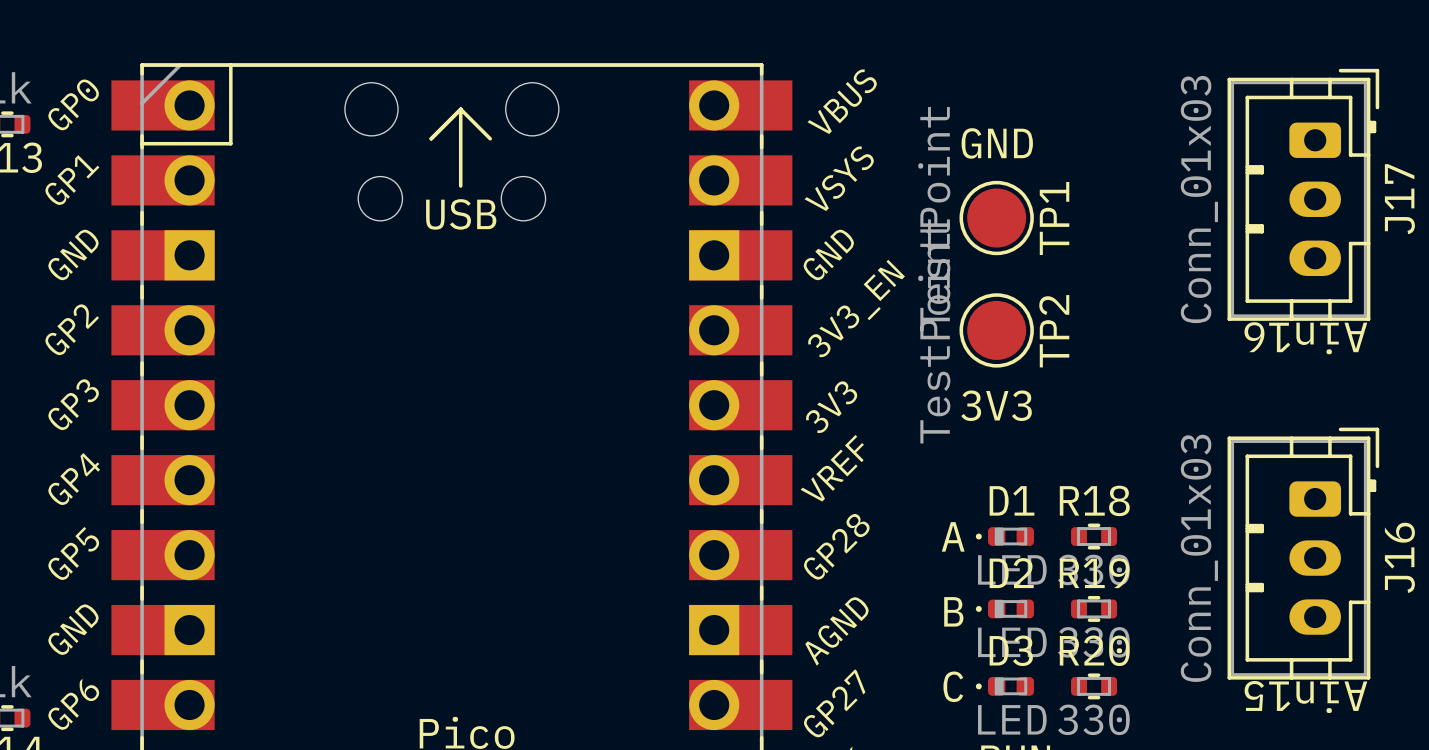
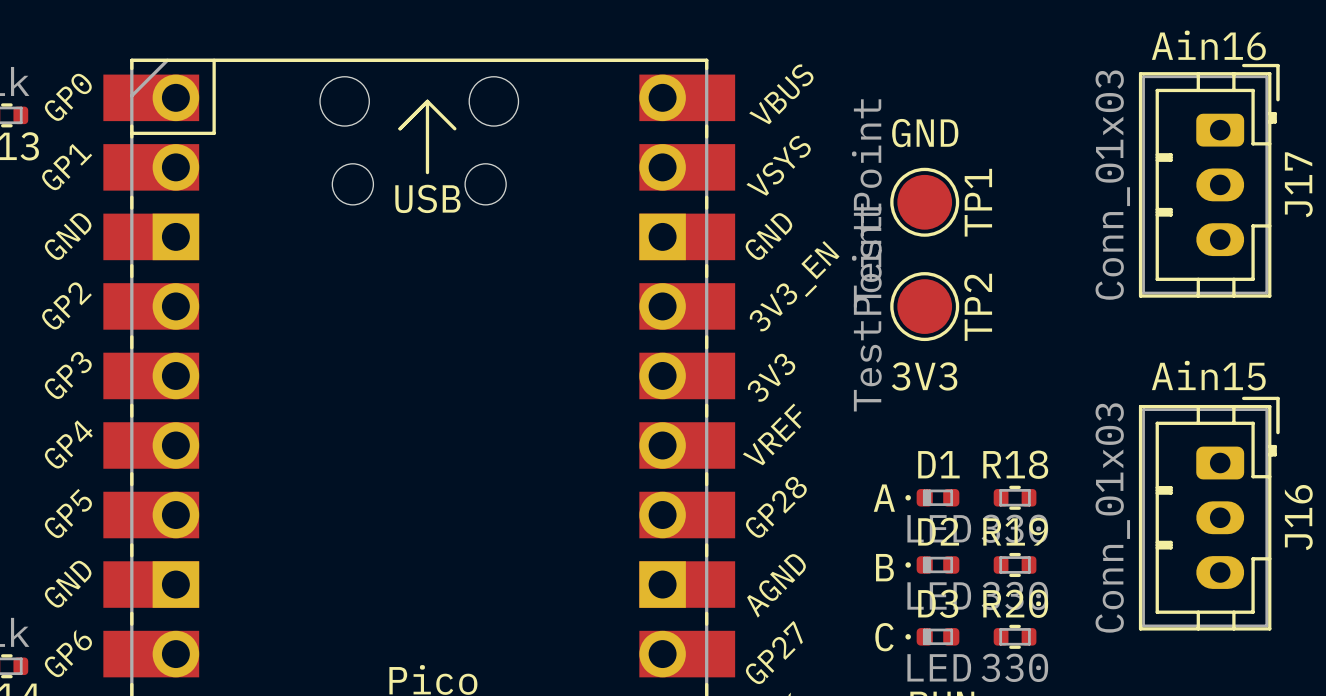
text rotation: 0° (1305, 338) -> 180° (1208, 45)
text position: Ain16 (1305, 338) -> Ain16 (1208, 45)
text rotation: 0° (1305, 697) -> 180° (1208, 375)
text position: Ain15 (1305, 697) -> Ain15 (1208, 375)

